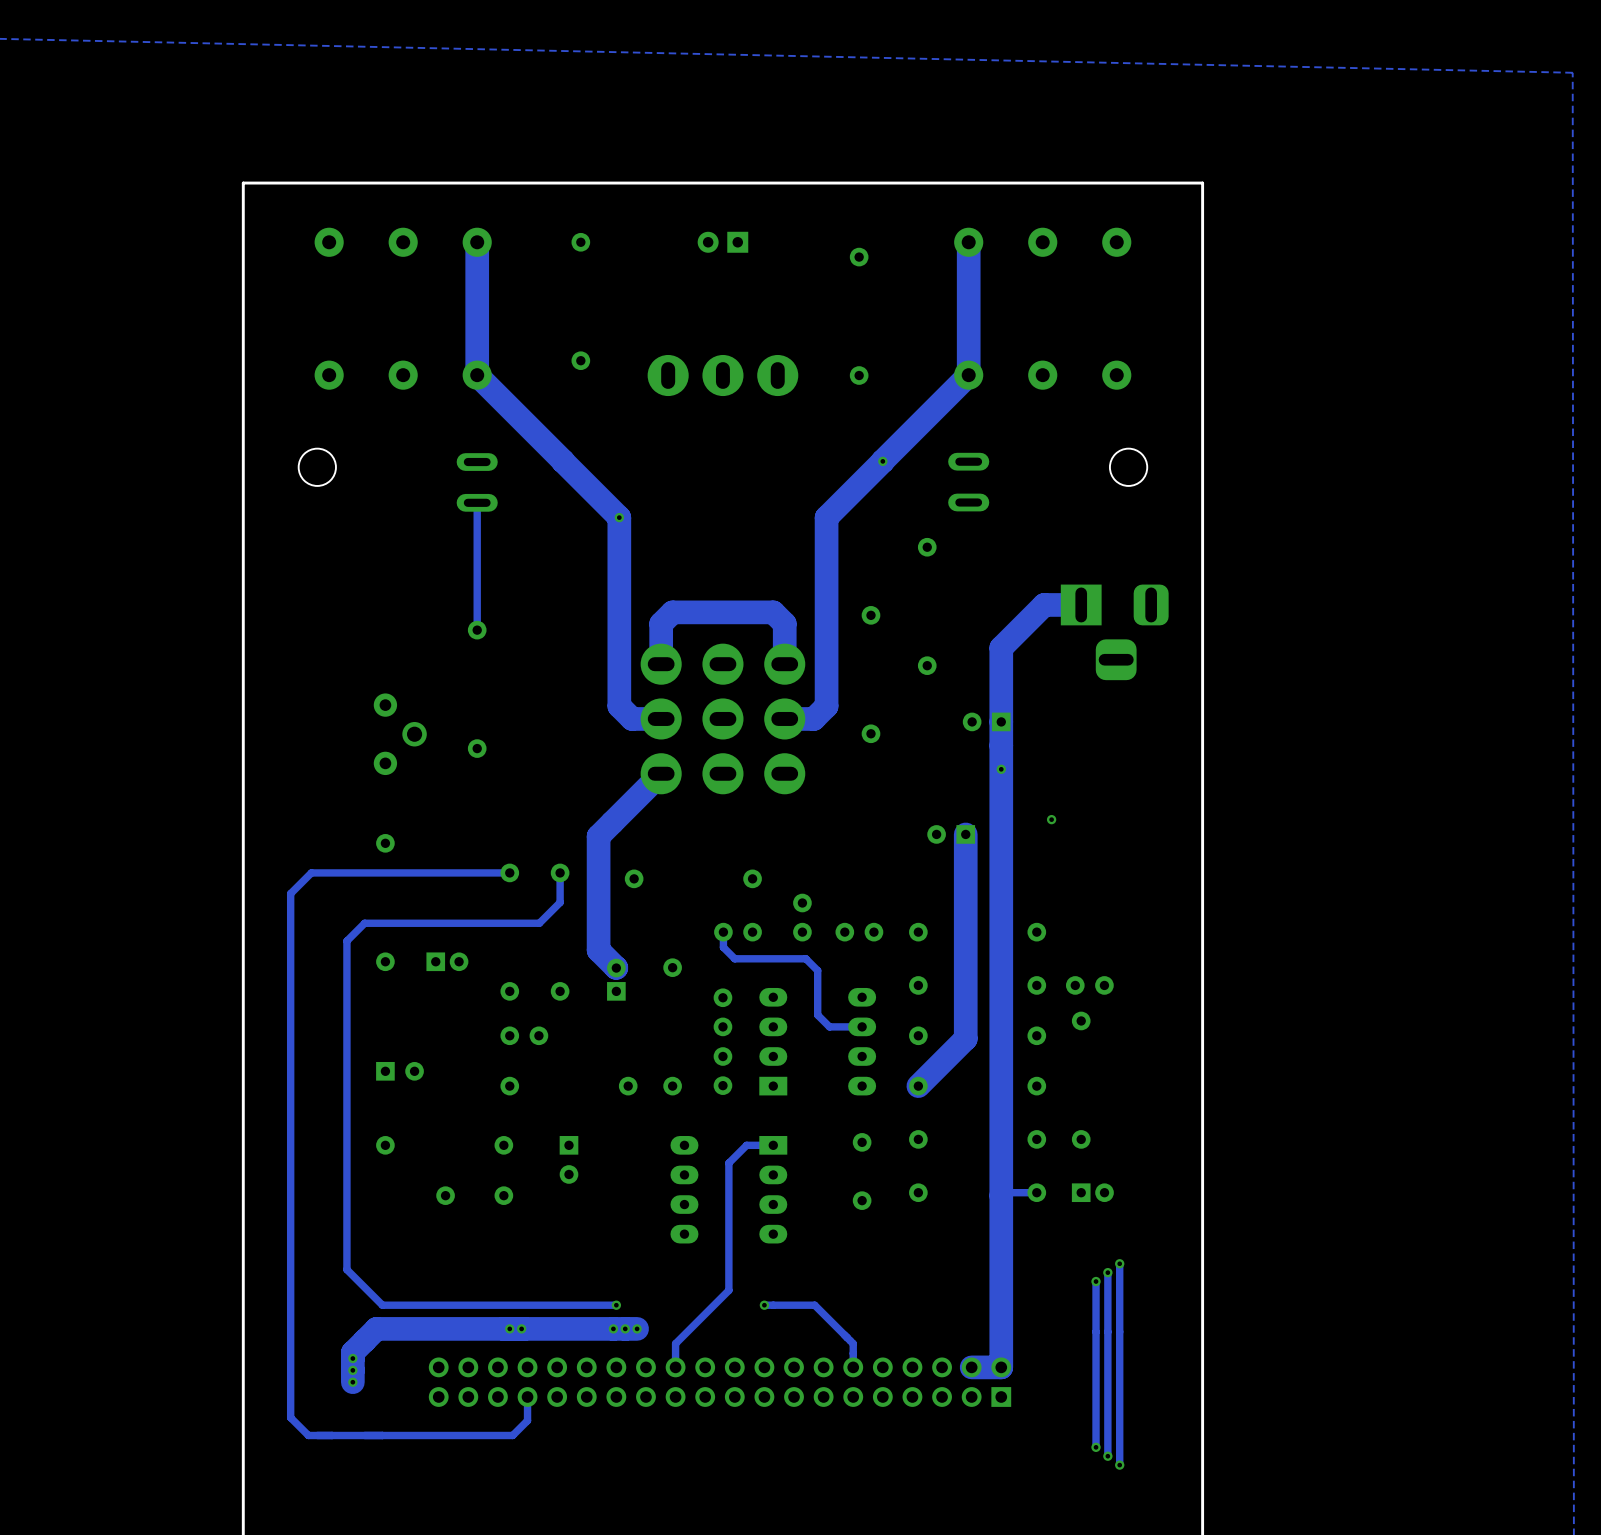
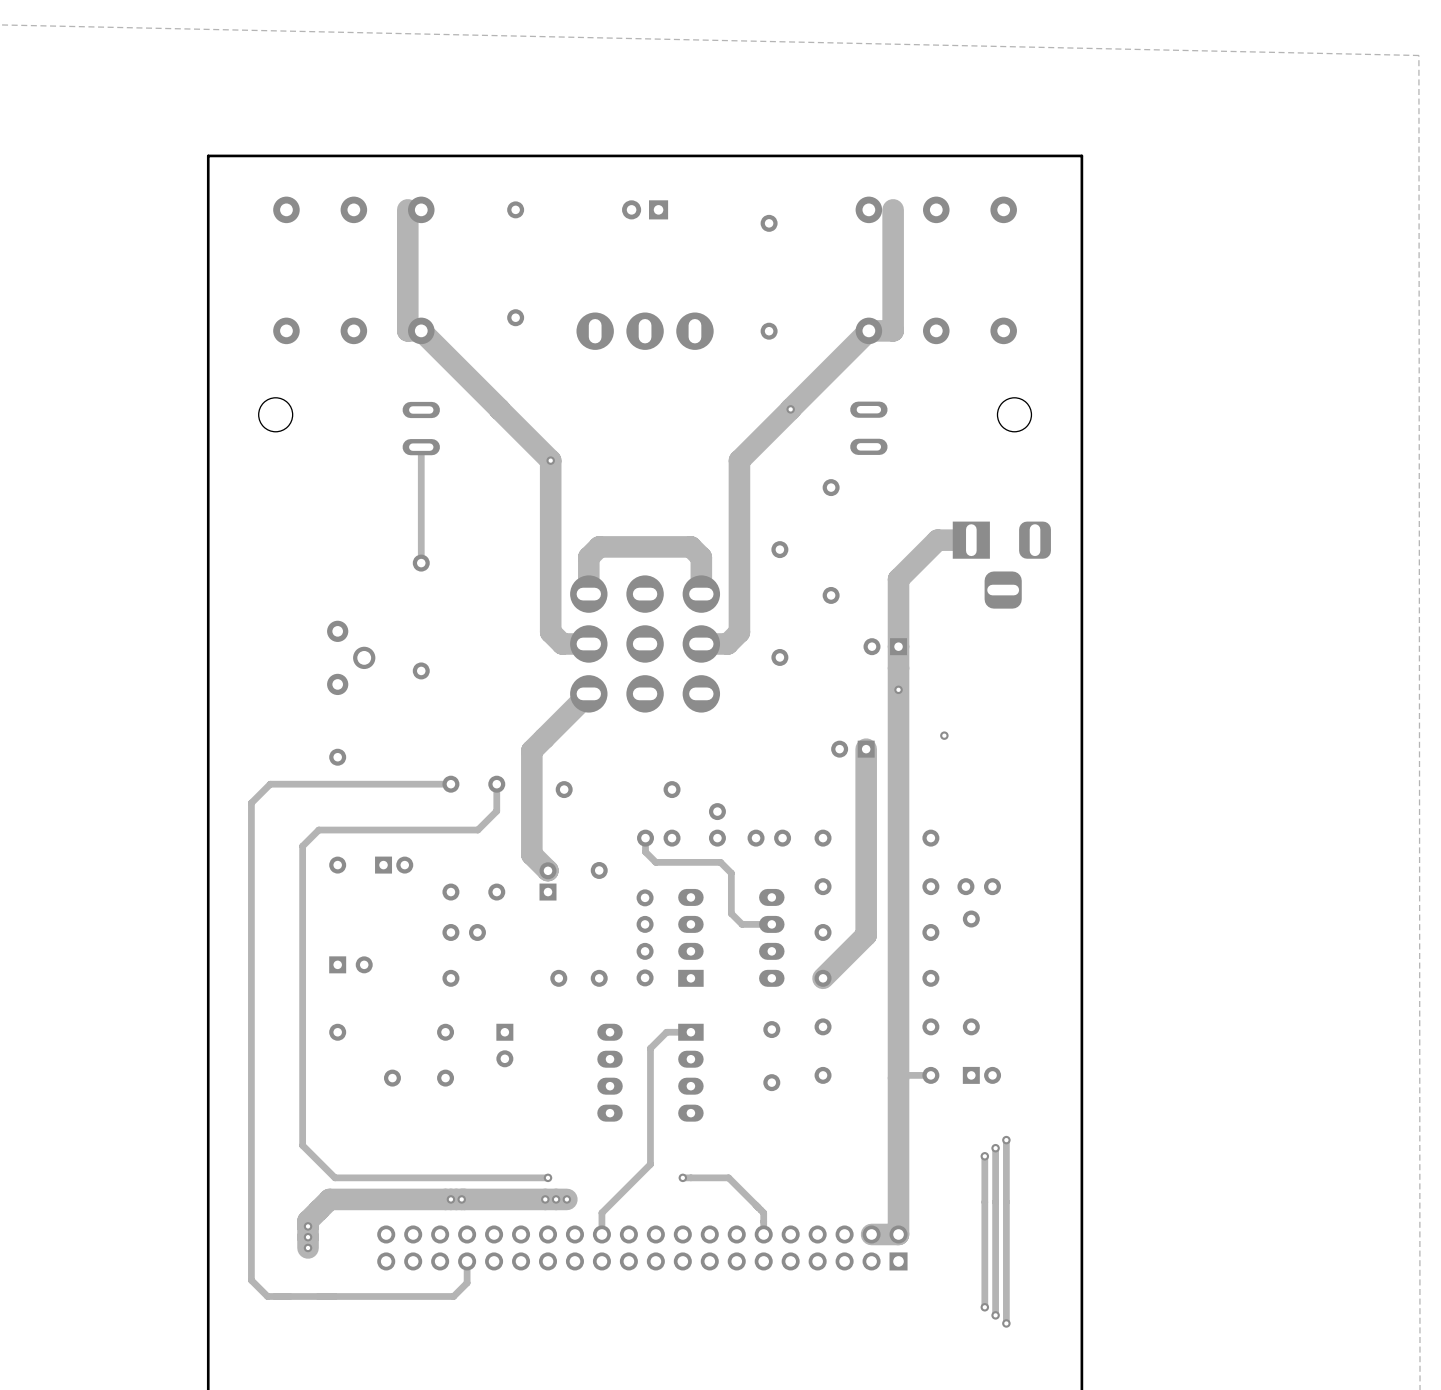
track: (477, 242) (477, 375) -> (407, 209) (407, 330) (421, 330)
track: (968, 242) (968, 375) -> (893, 209) (893, 330) (868, 330)

